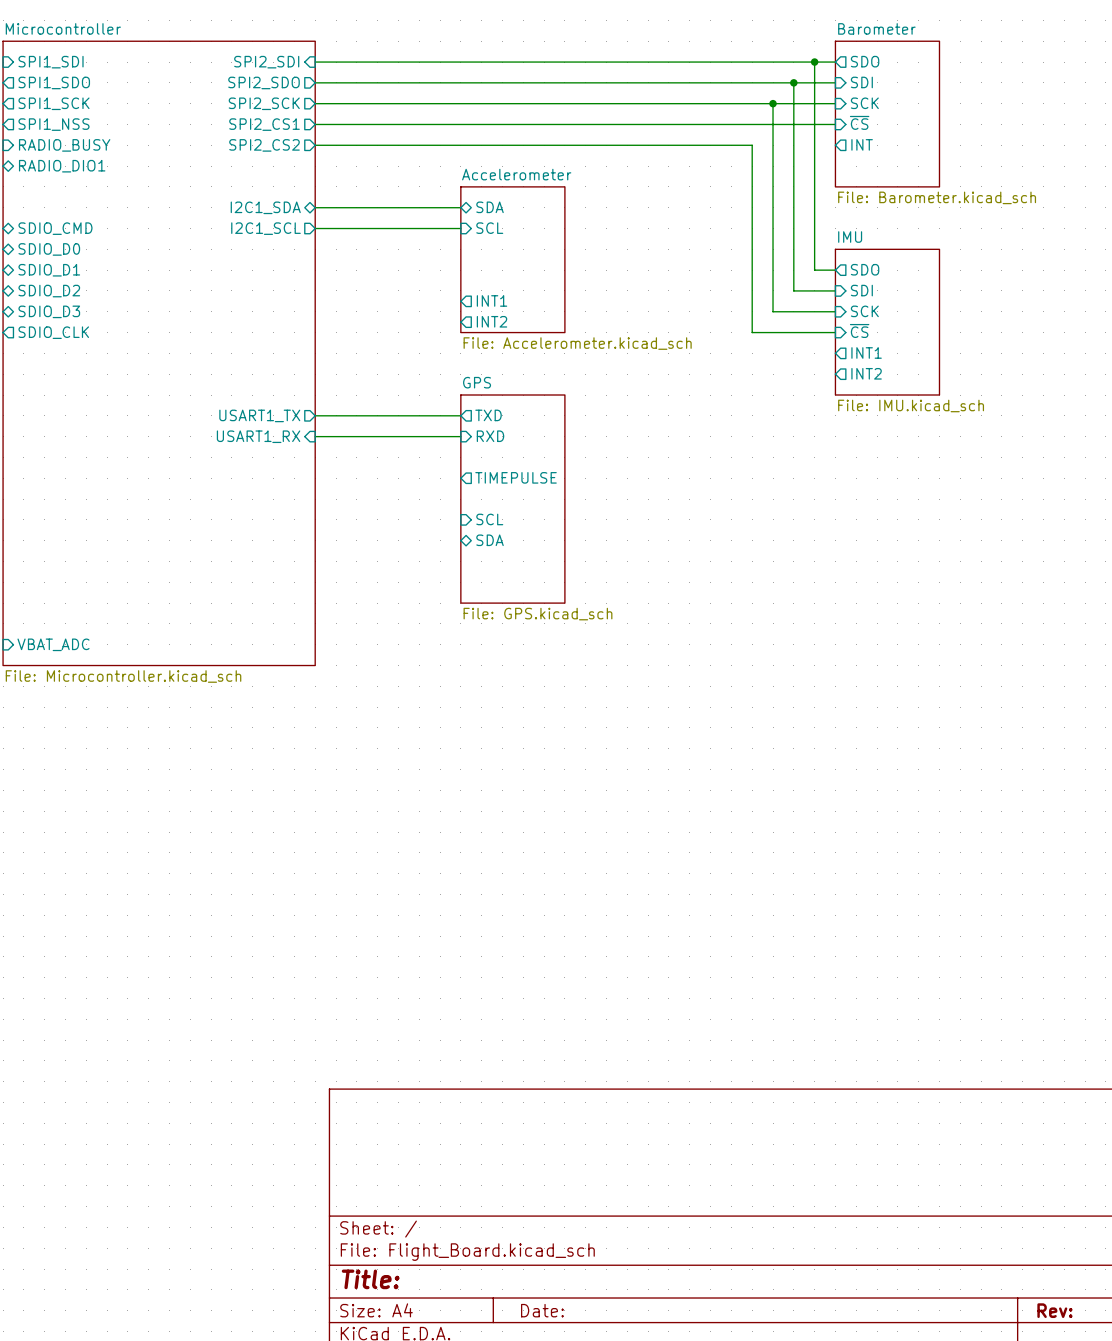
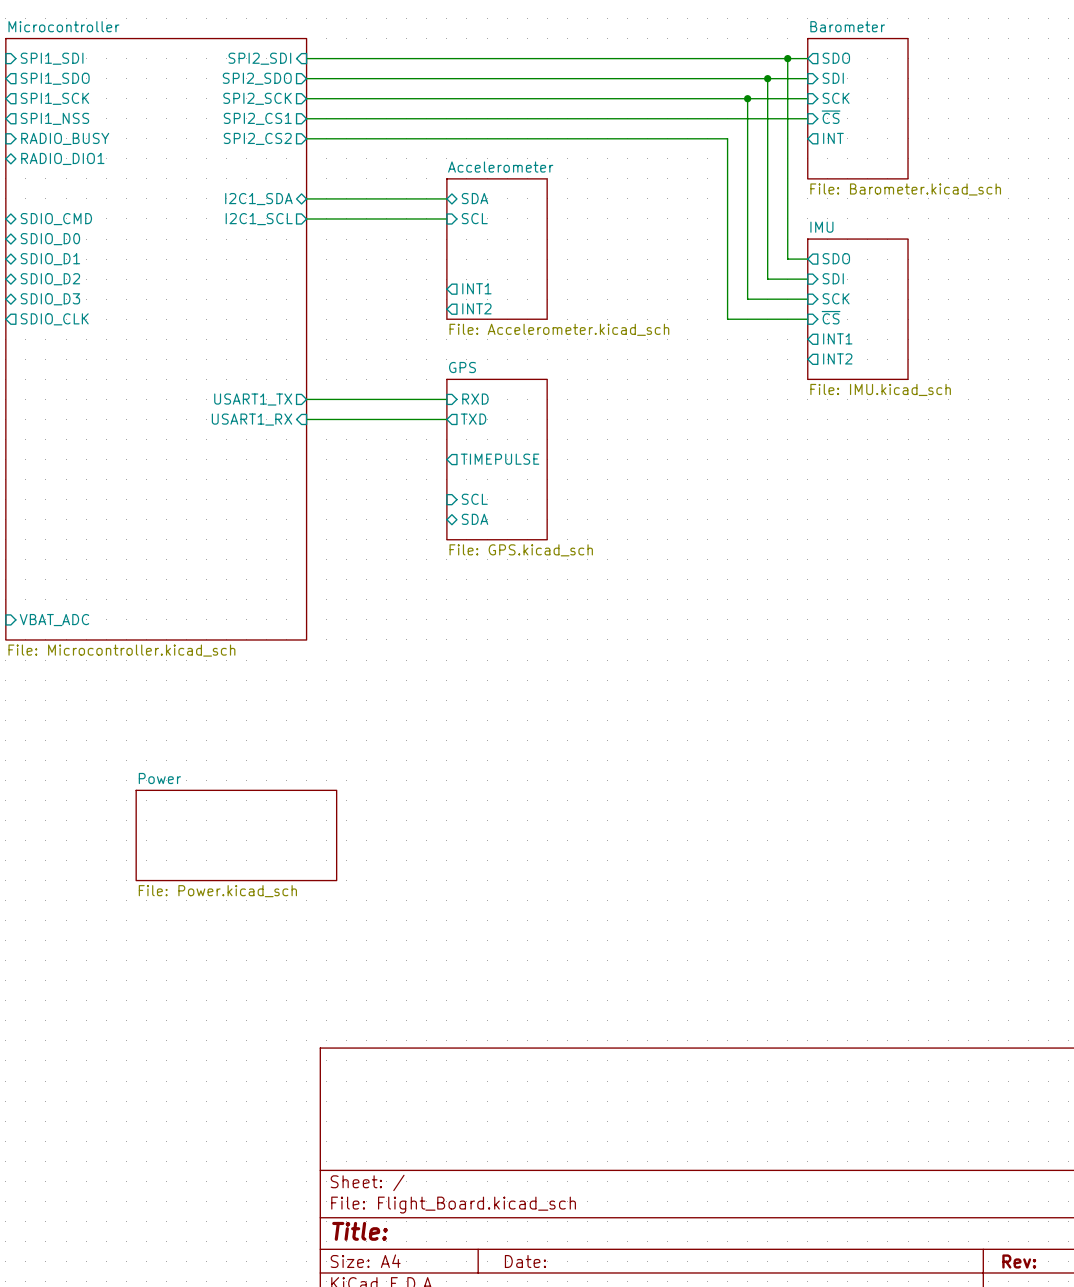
sheet pin shape: output (488, 415) -> input (475, 399)
sheet pin: TXD (488, 415) -> RXD (475, 399)
sheet pin shape: input (490, 436) -> output (473, 419)
sheet pin: RXD (490, 436) -> TXD (473, 419)
sheet GPS: none -> File: GPS.kicad_sch (497, 459)
sheet GPS: File: GPS.kicad_sch (512, 499) -> none
sheet Power: none -> File: Power.kicad_sch (236, 835)

